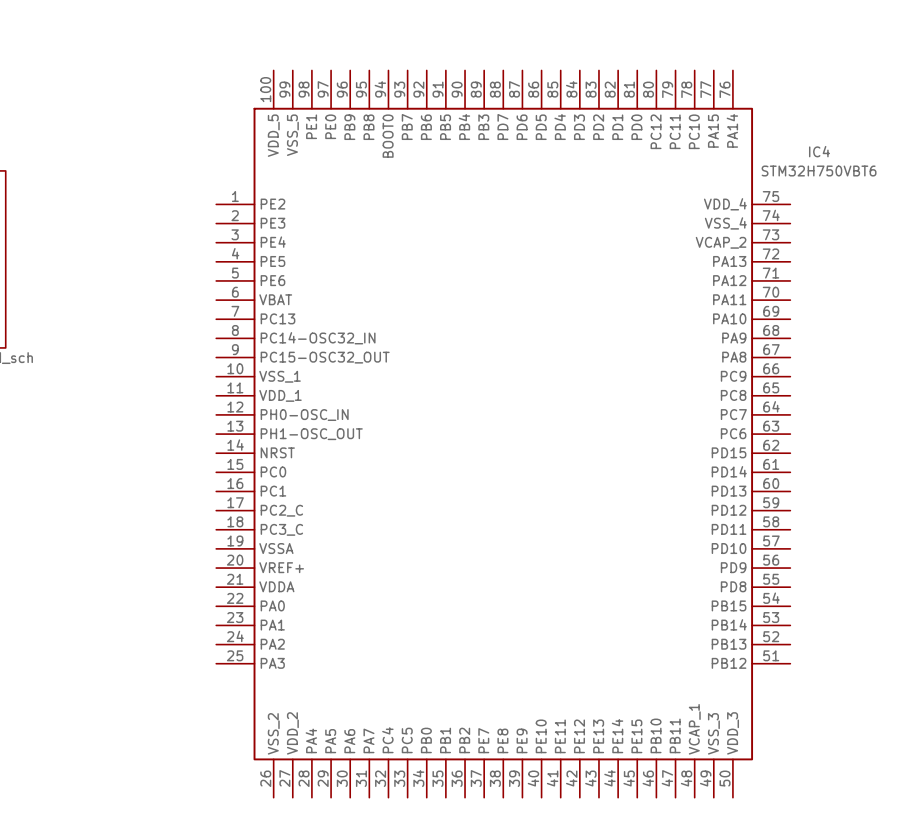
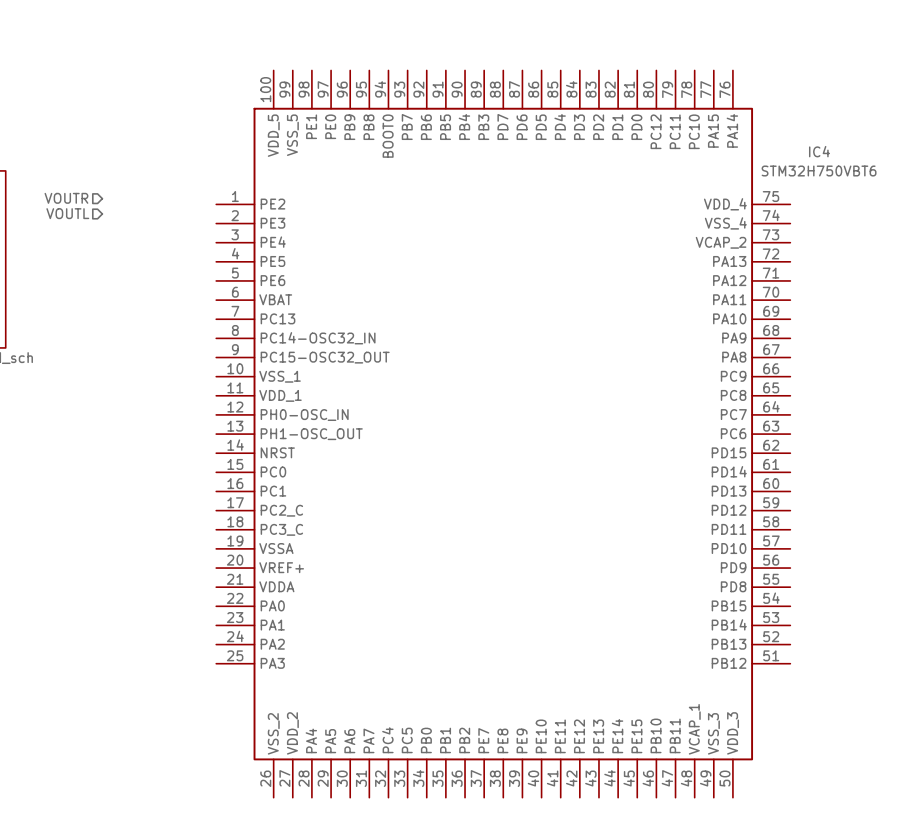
sheet pin: none -> VOUTR (66, 198)
sheet pin: none -> VOUTL (67, 213)

